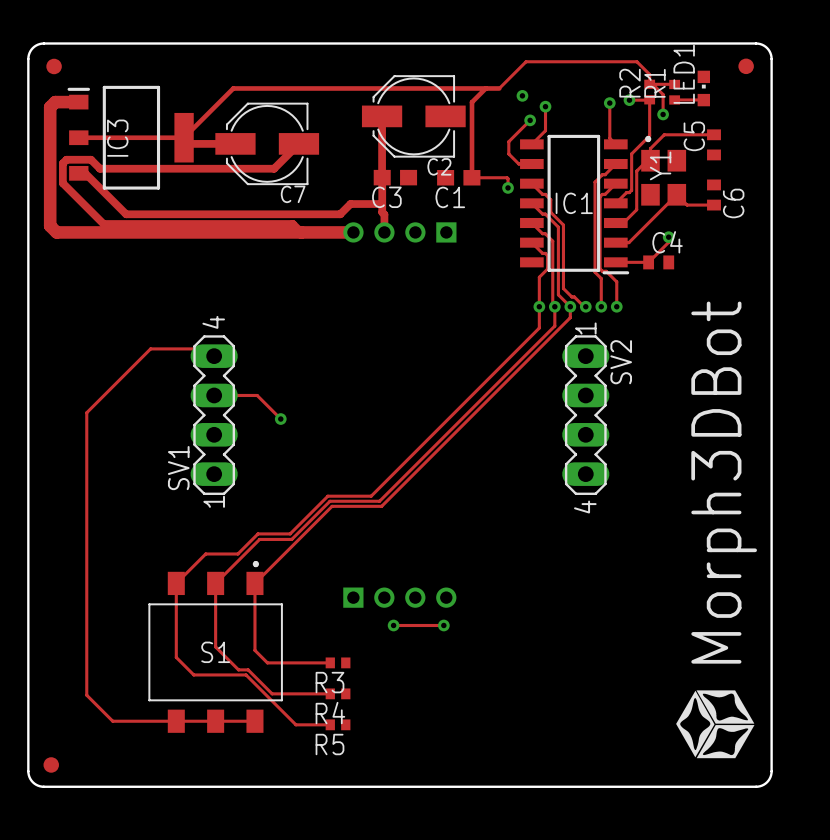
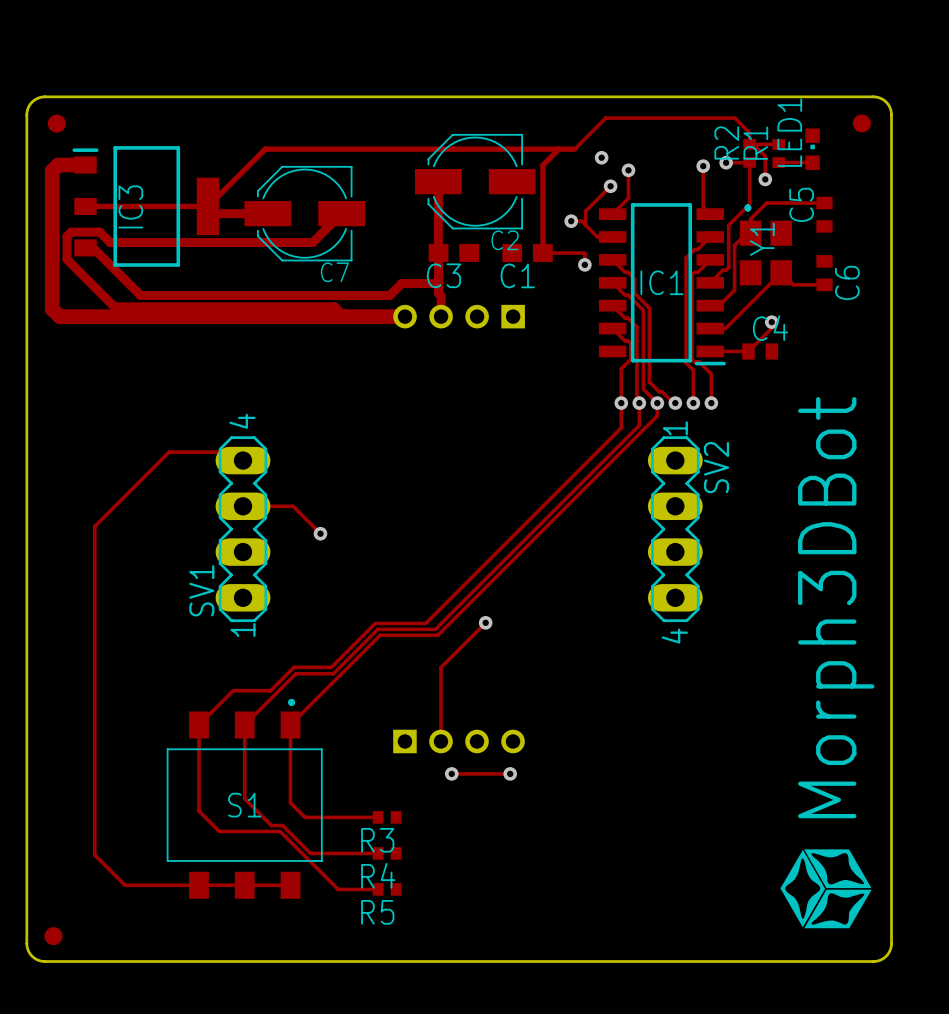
track: none -> (571, 221) (581, 221) (585, 225)
via: none -> (571, 221)
track: none -> (485, 622) (440, 667) (440, 741)
via: none -> (485, 622)

